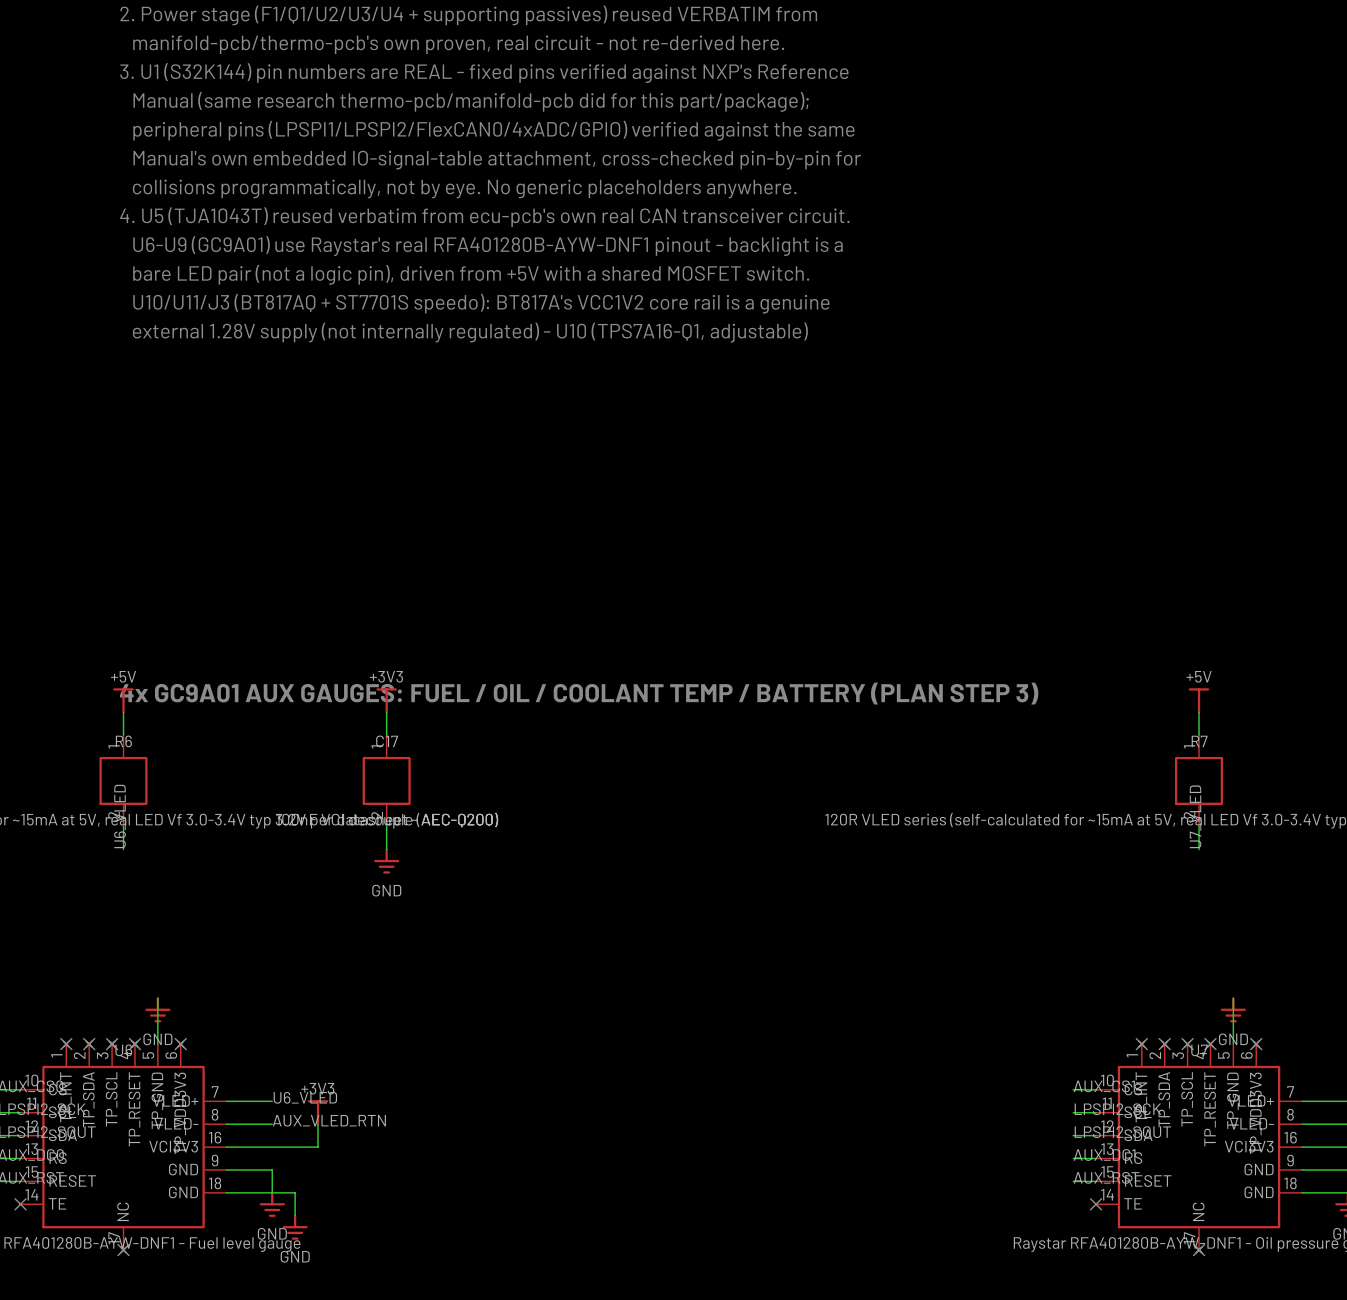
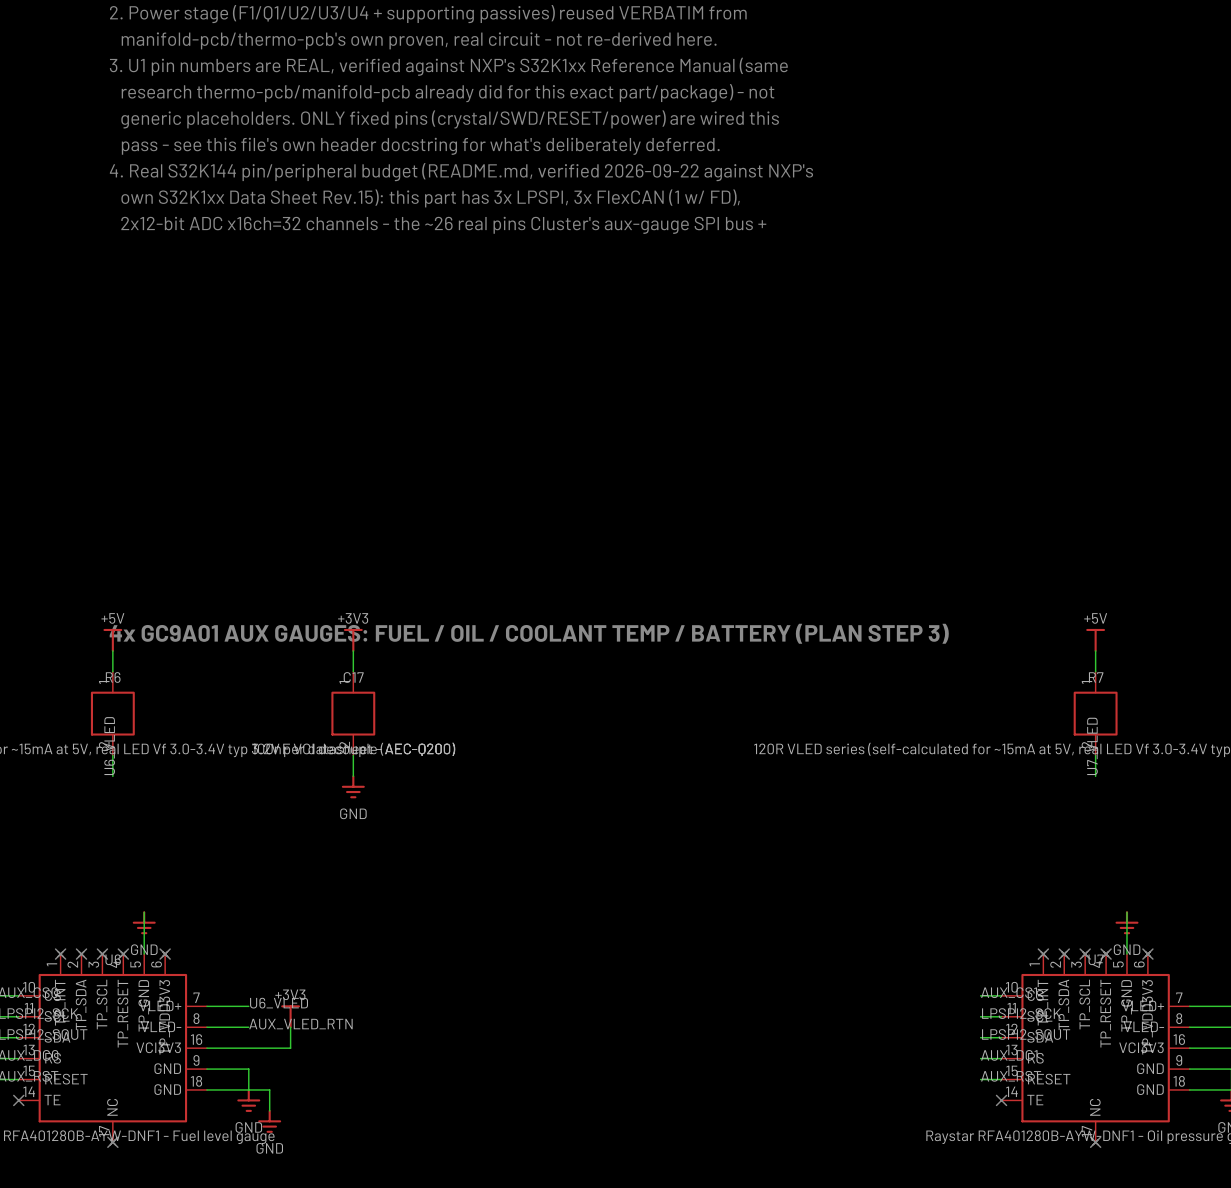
text: 3. U1 (S32K144) pin numbers are REAL - fixed pins verified against NXP's Reference (484, 73) -> 3. U1 pin numbers are REAL, verified against NXP's S32K1xx Reference Manual (same (448, 66)
text: Manual (same research thermo-pcb/manifold-pcb did for this part/package); (471, 101) -> research thermo-pcb/manifold-pcb already did for this exact part/package) - not (448, 93)
text: peripheral pins (LPSPI1/LPSPI2/FlexCAN0/4xADC/GPIO) verified against the same (493, 130) -> generic placeholders. ONLY fixed pins (crystal/SWD/RESET/power) are wired this (450, 119)
text: Manual's own embedded IO-signal-table attachment, cross-checked pin-by-pin for (497, 160) -> pass - see this file's own header docstring for what's deliberately deferred. (420, 146)
text: collisions programmatically, not by eye. No generic placeholders anywhere. (464, 188) -> 4. Real S32K144 pin/peripheral budget (README.md, verified 2026-09-22 against NXP's (461, 172)
text: 4. U5 (TJA1043T) reused verbatim from ecu-pcb's own real CAN transceiver circuit. (484, 217) -> own S32K1xx Data Sheet Rev.15): this part has 3x LPSPI, 3x FlexCAN (1 w/ FD), (430, 198)
text: U6-U9 (GC9A01) use Raystar's real RFA401280B-AYW-DNF1 pinout - backlight is a (488, 246) -> 2x12-bit ADC x16ch=32 channels - the ~26 real pins Cluster's aux-gauge SPI bus + (443, 225)
text: bare LED pair (not a logic pin), driven from +5V with a shared MOSFET switch. (471, 274) -> none
text: U10/U11/J3 (BT817AQ + ST7701S speedo): BT817A's VCC1V2 core rail is a genuine (481, 303) -> none
text: external 1.28V supply (not internally regulated) - U10 (TPS7A16-Q1, adjustable) (470, 332) -> none

